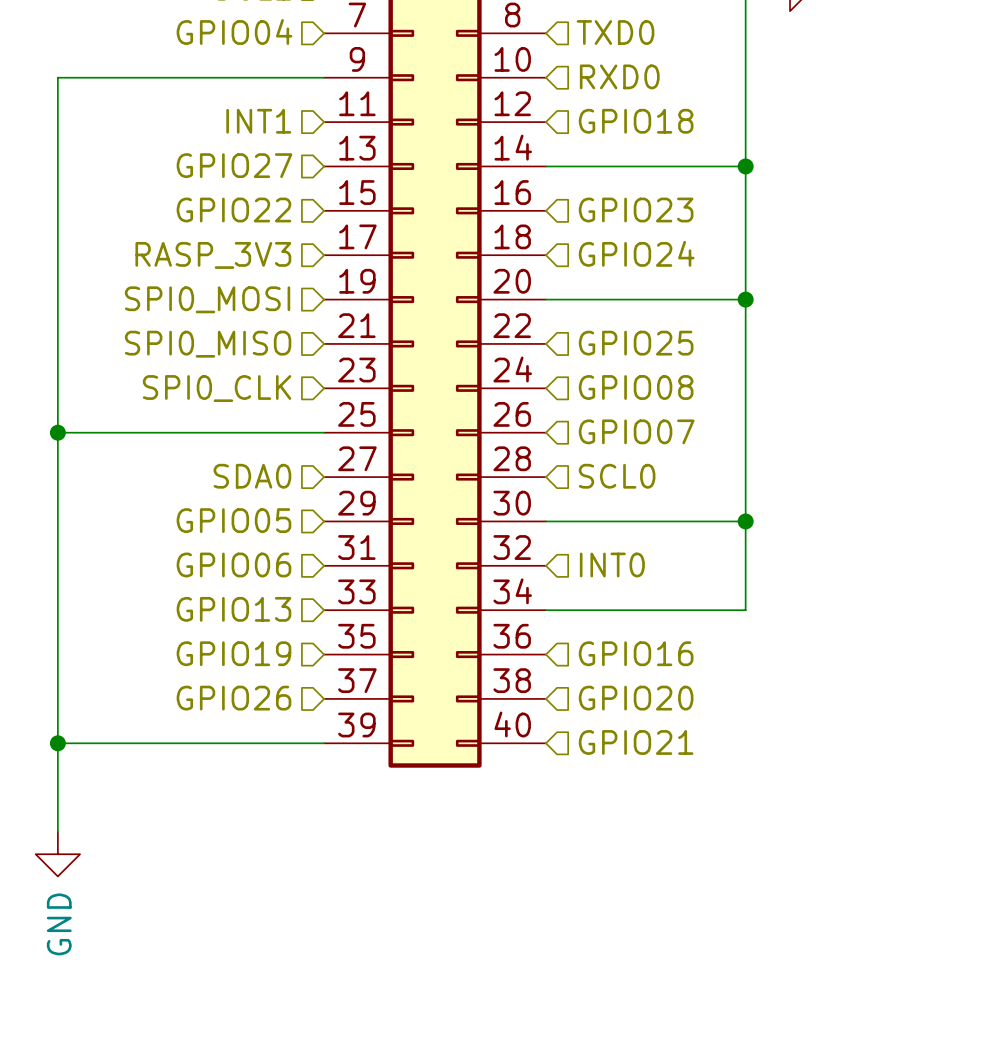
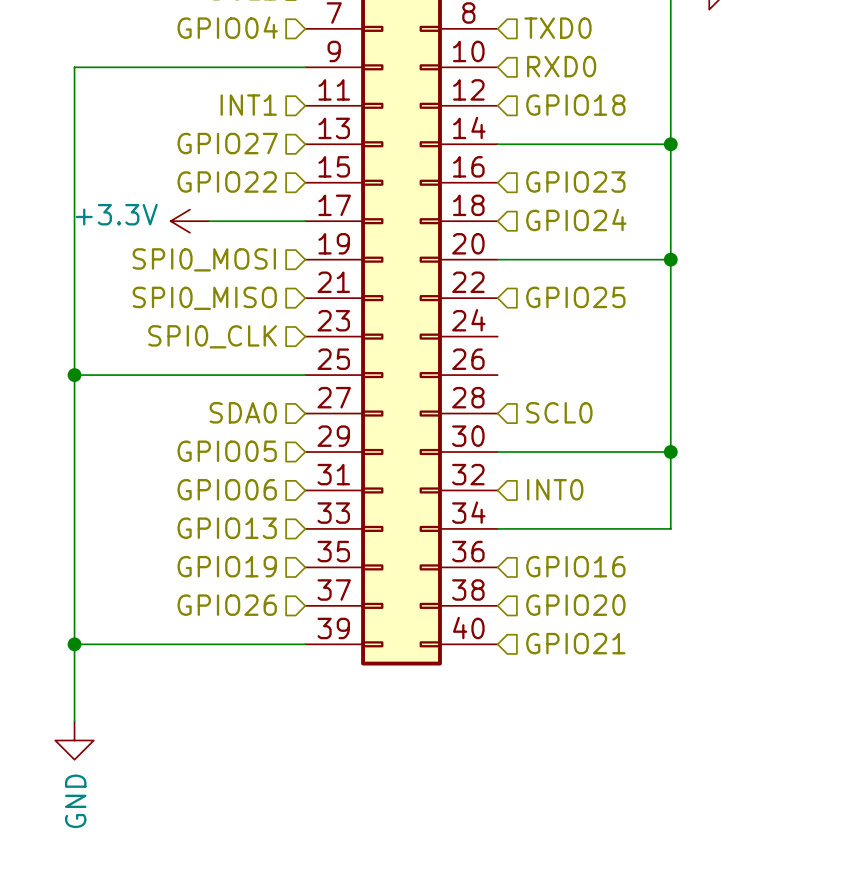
power symbol: none -> +3.3V (189, 221)
wire: none -> (209, 221) (305, 221)
hierarchical label: RASP_3V3 (213, 255) -> none
hierarchical label: GPIO08 (636, 387) -> none
hierarchical label: GPIO07 (636, 431) -> none

